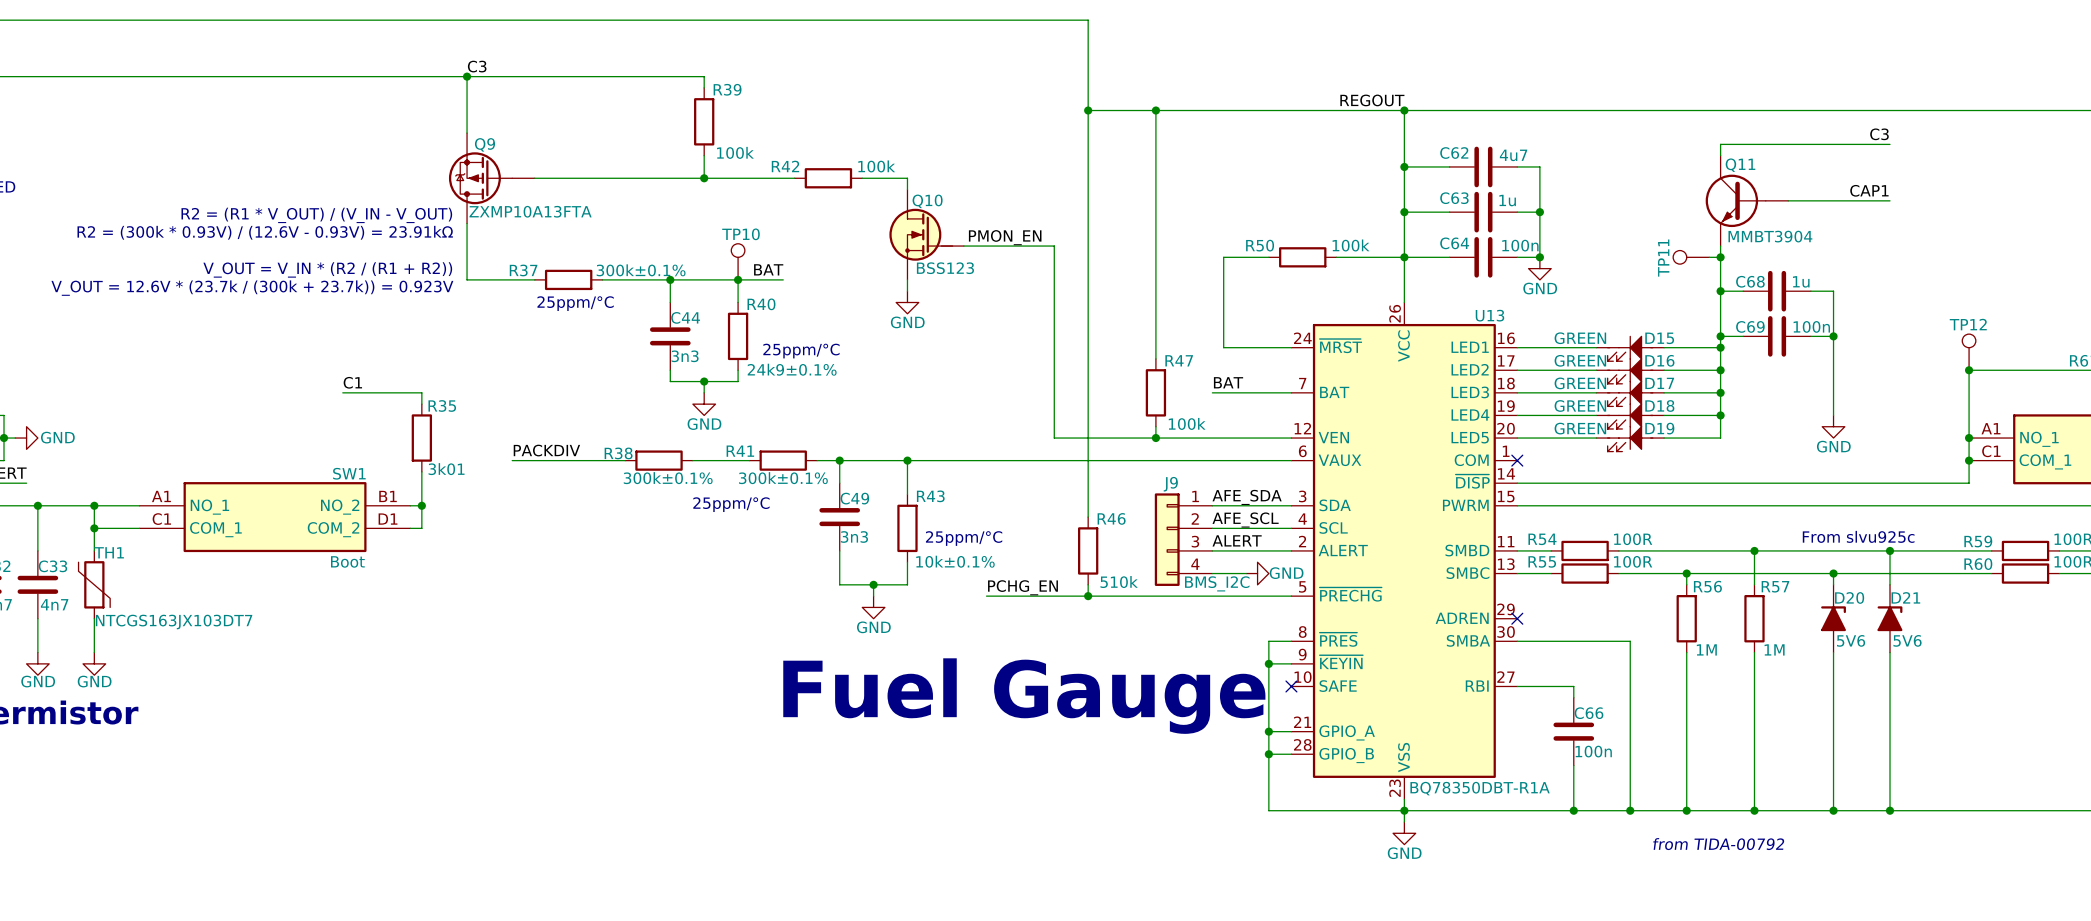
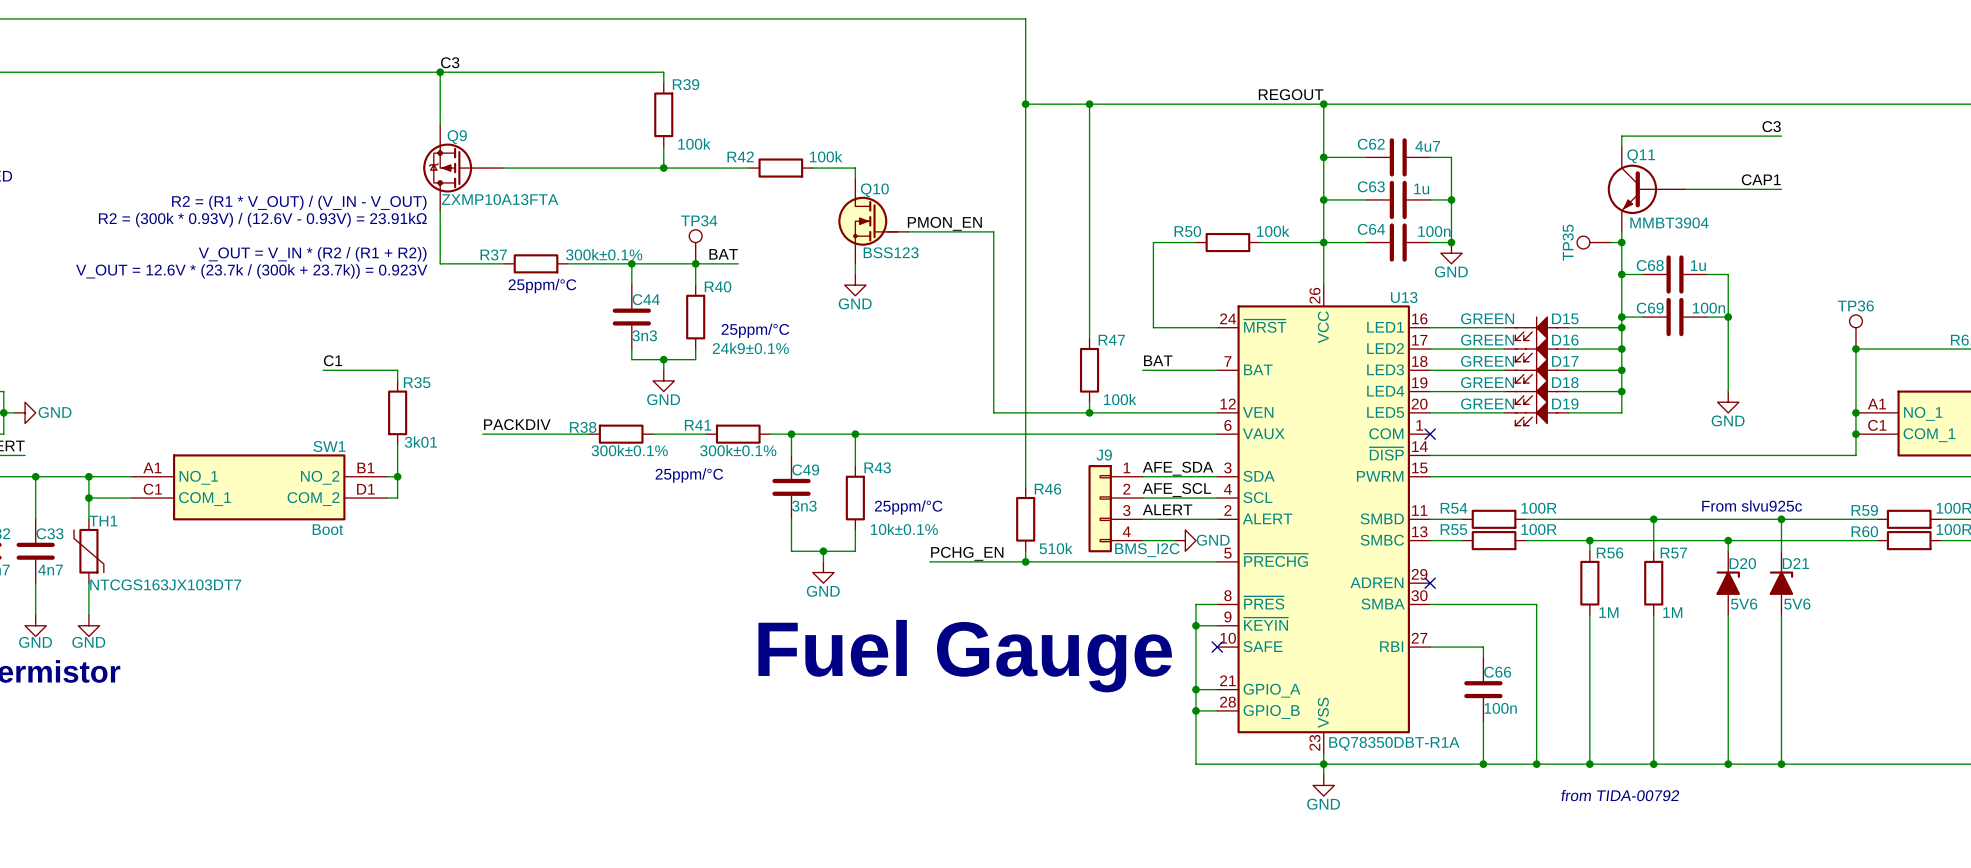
TP10 name: TP10 (740, 234) -> TP34 (699, 220)
TP11 name: TP11 (1663, 258) -> TP35 (1568, 242)
TP12 name: TP12 (1968, 324) -> TP36 (1855, 306)

